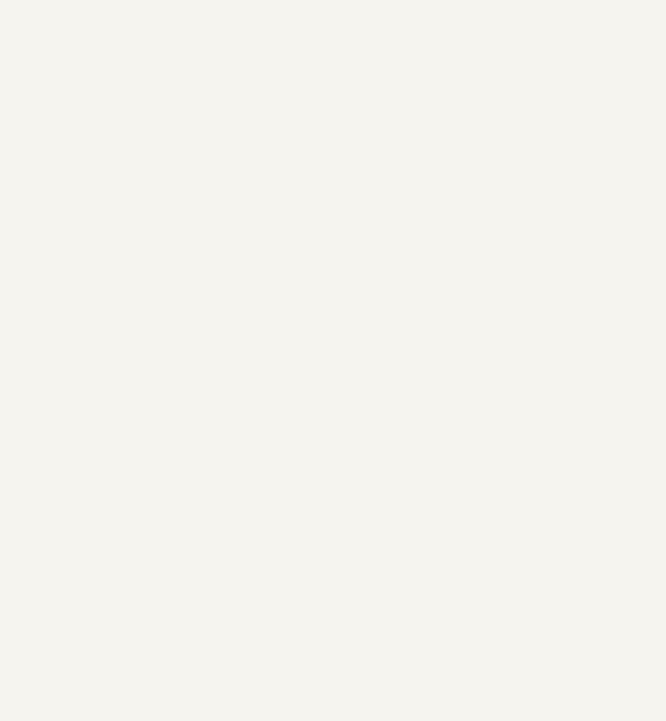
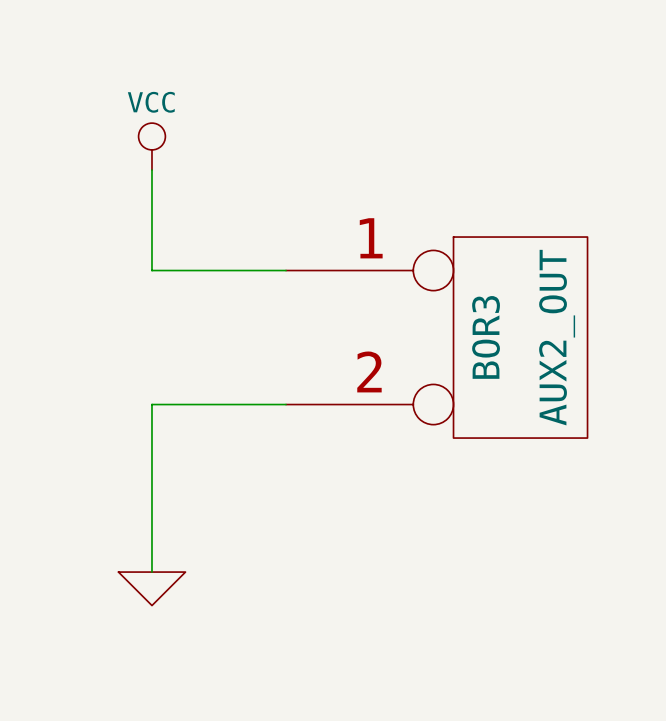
power symbol: none -> VCC (151, 146)
wire: none -> (151, 170) (151, 270) (286, 270)
BOR3: none -> AUX2_OUT (436, 337)
wire: none -> (286, 404) (151, 404) (151, 572)
power symbol: none -> (151, 588)

